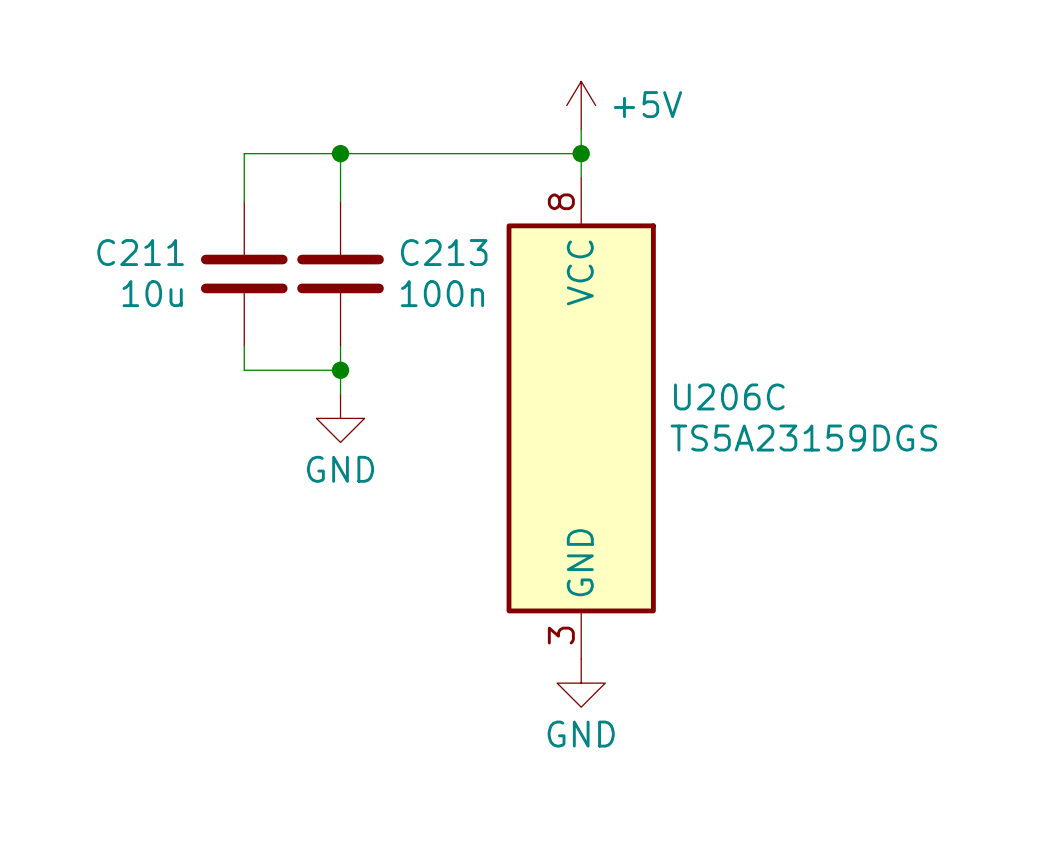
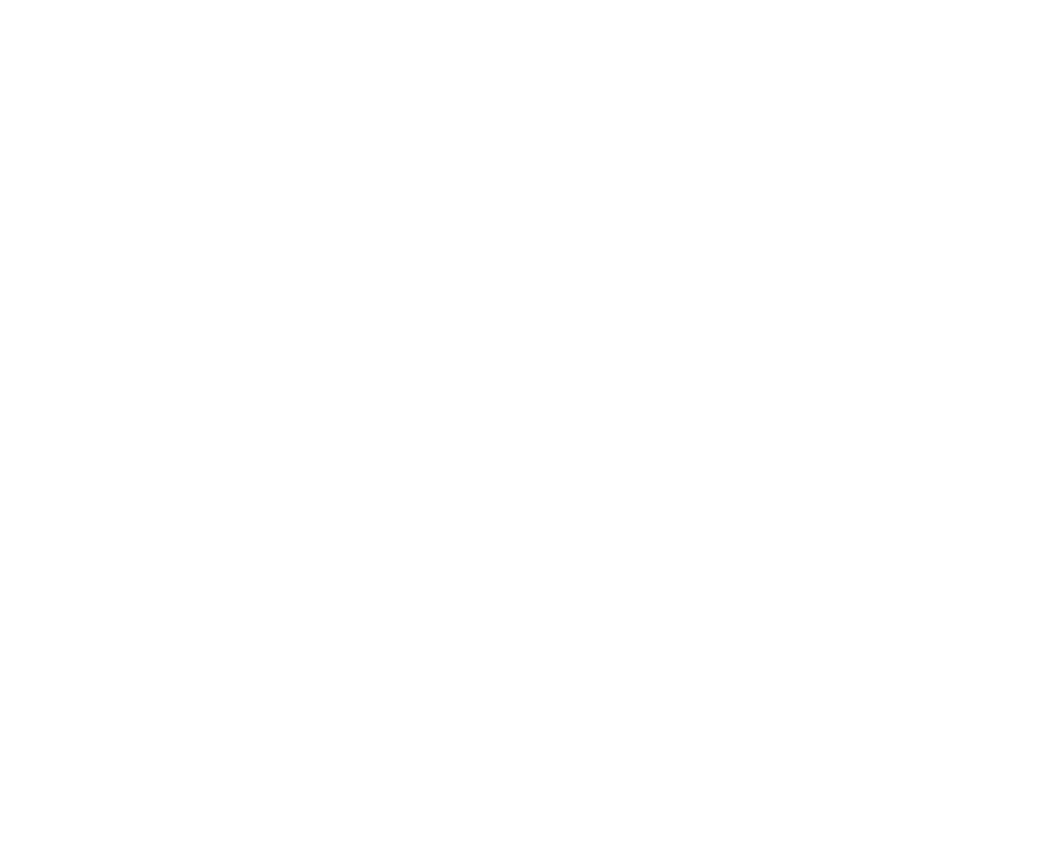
power symbol: +5V (581, 105) -> none
wire: (581, 129) (581, 177) -> none
wire: (340, 153) (340, 201) -> none
junction: (340, 153) -> none
wire: (581, 153) (244, 153) (244, 201) -> none
junction: (581, 153) -> none
C211: 10u (244, 273) -> none
C213: 100n (340, 273) -> none
wire: (244, 346) (244, 370) (340, 370) -> none
wire: (340, 346) (340, 394) -> none
junction: (340, 370) -> none
power symbol: GND (340, 418) -> none
U206C: TS5A23159DGS (581, 418) -> none
power symbol: GND (581, 683) -> none

